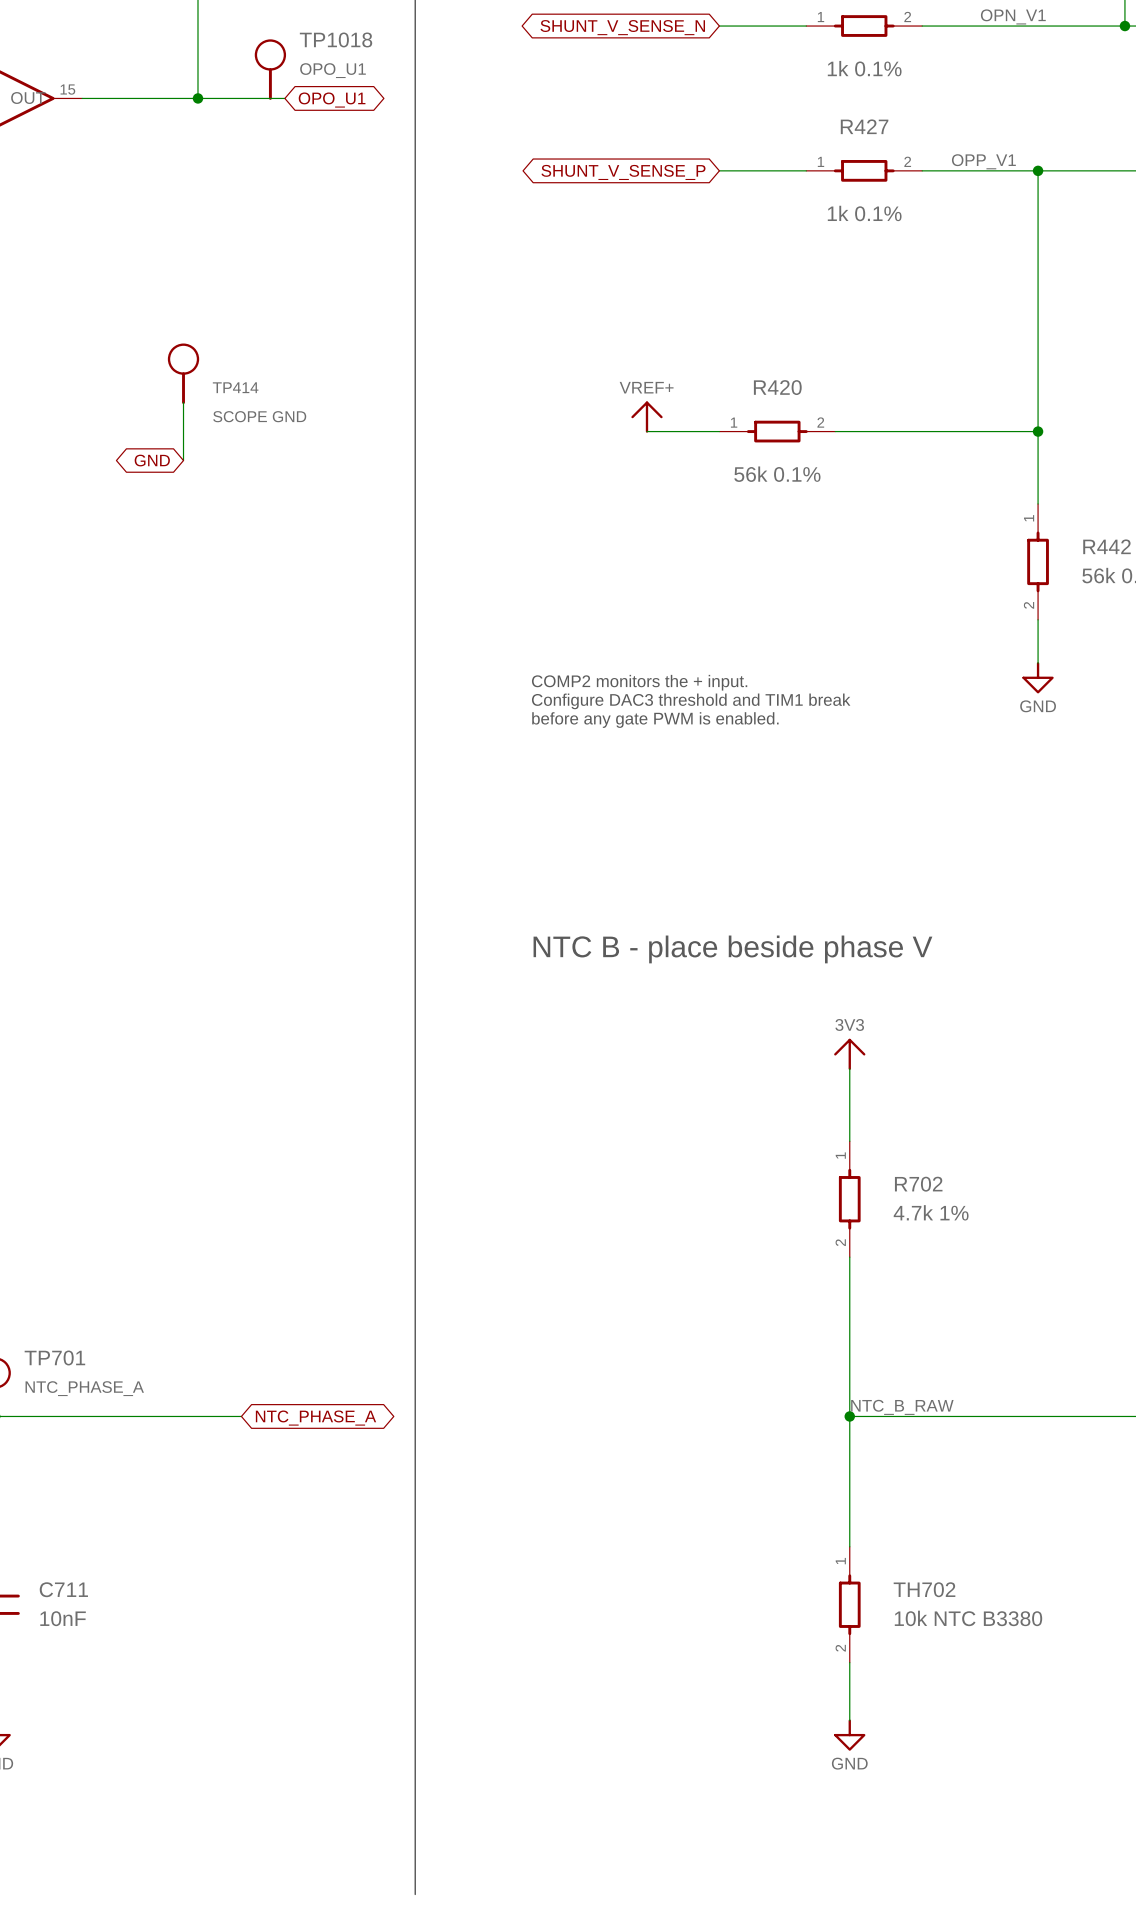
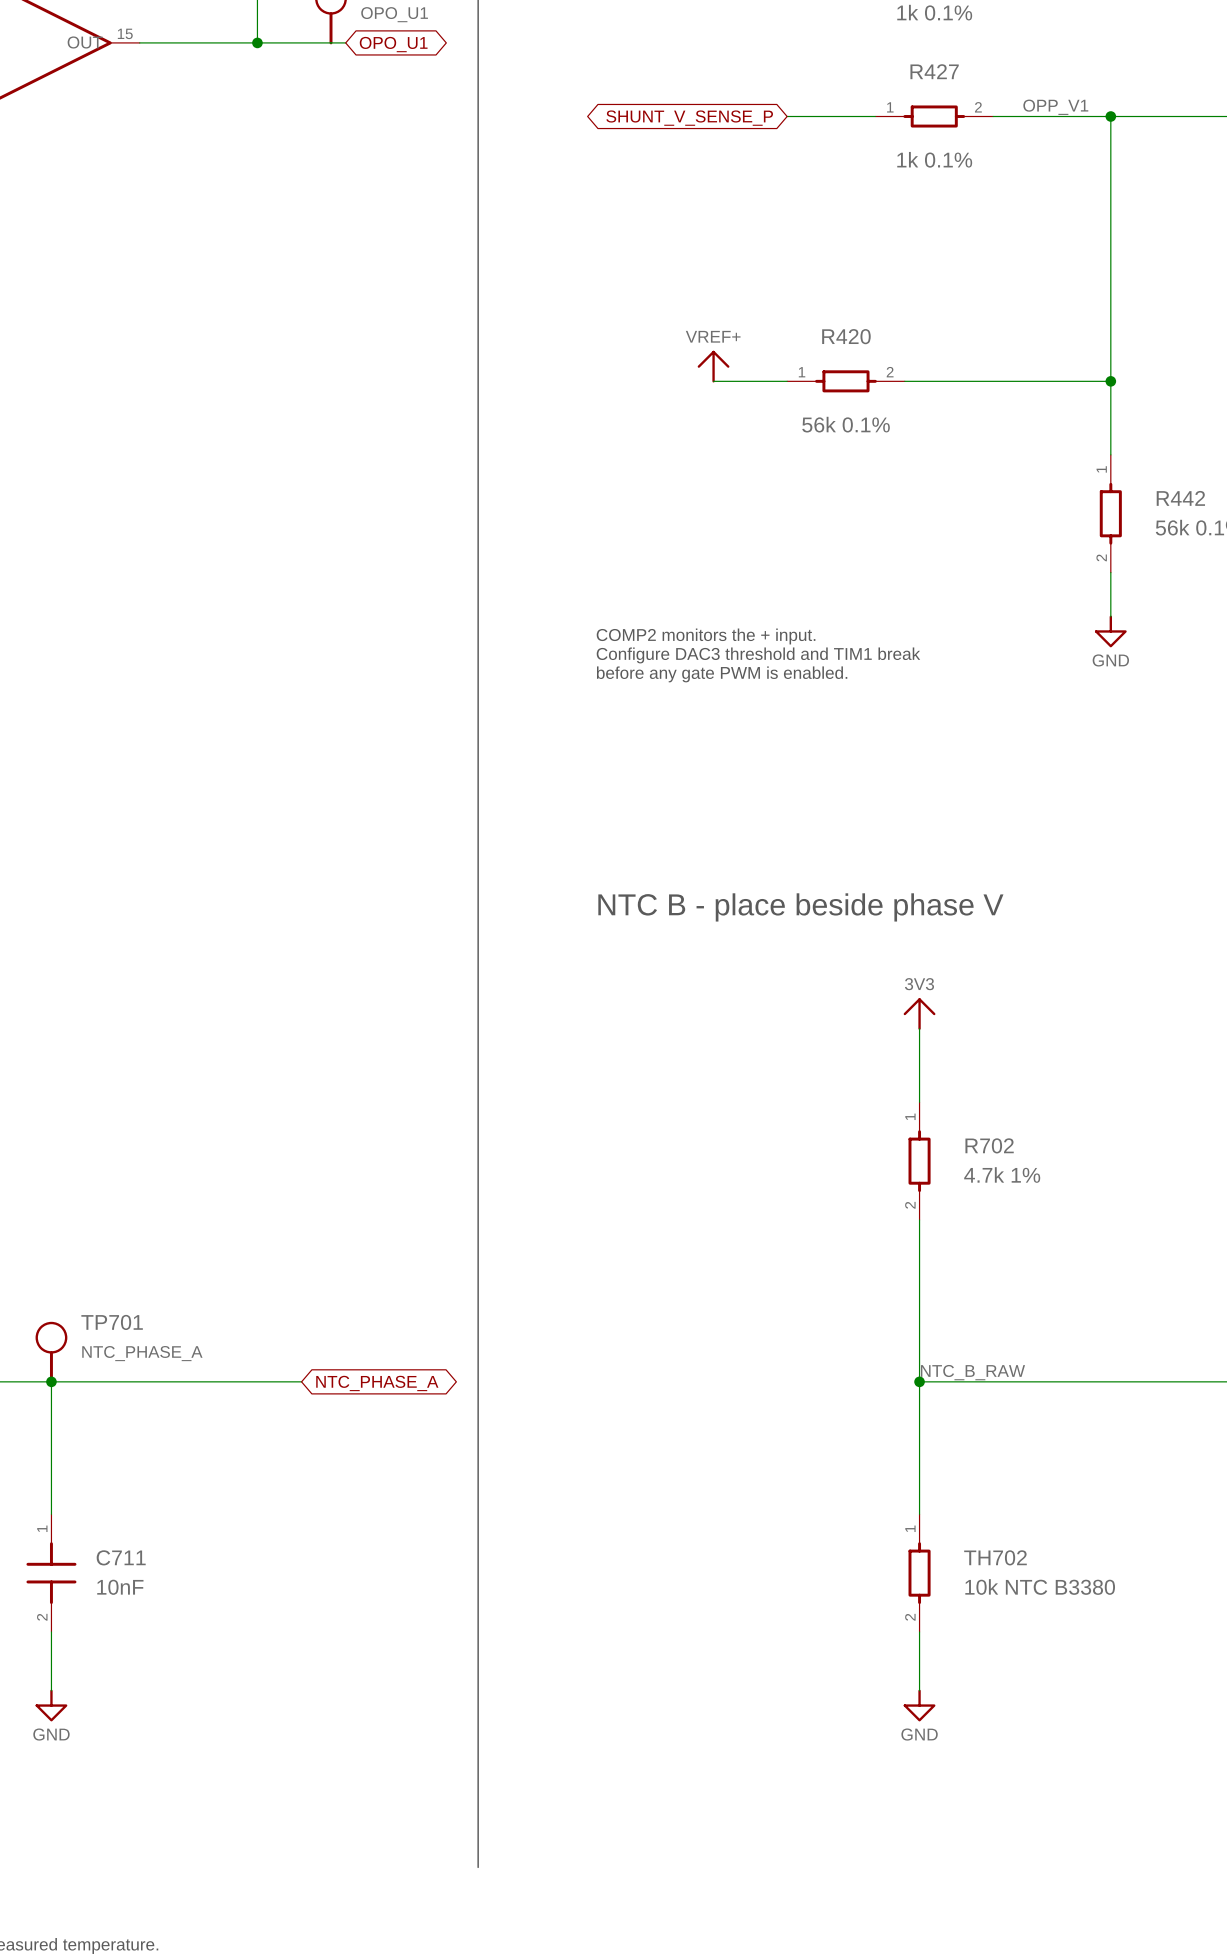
TP414: SCOPE GND (183, 373) -> none
wire: (183, 402) (183, 460) -> none
global label: GND (152, 460) -> none

